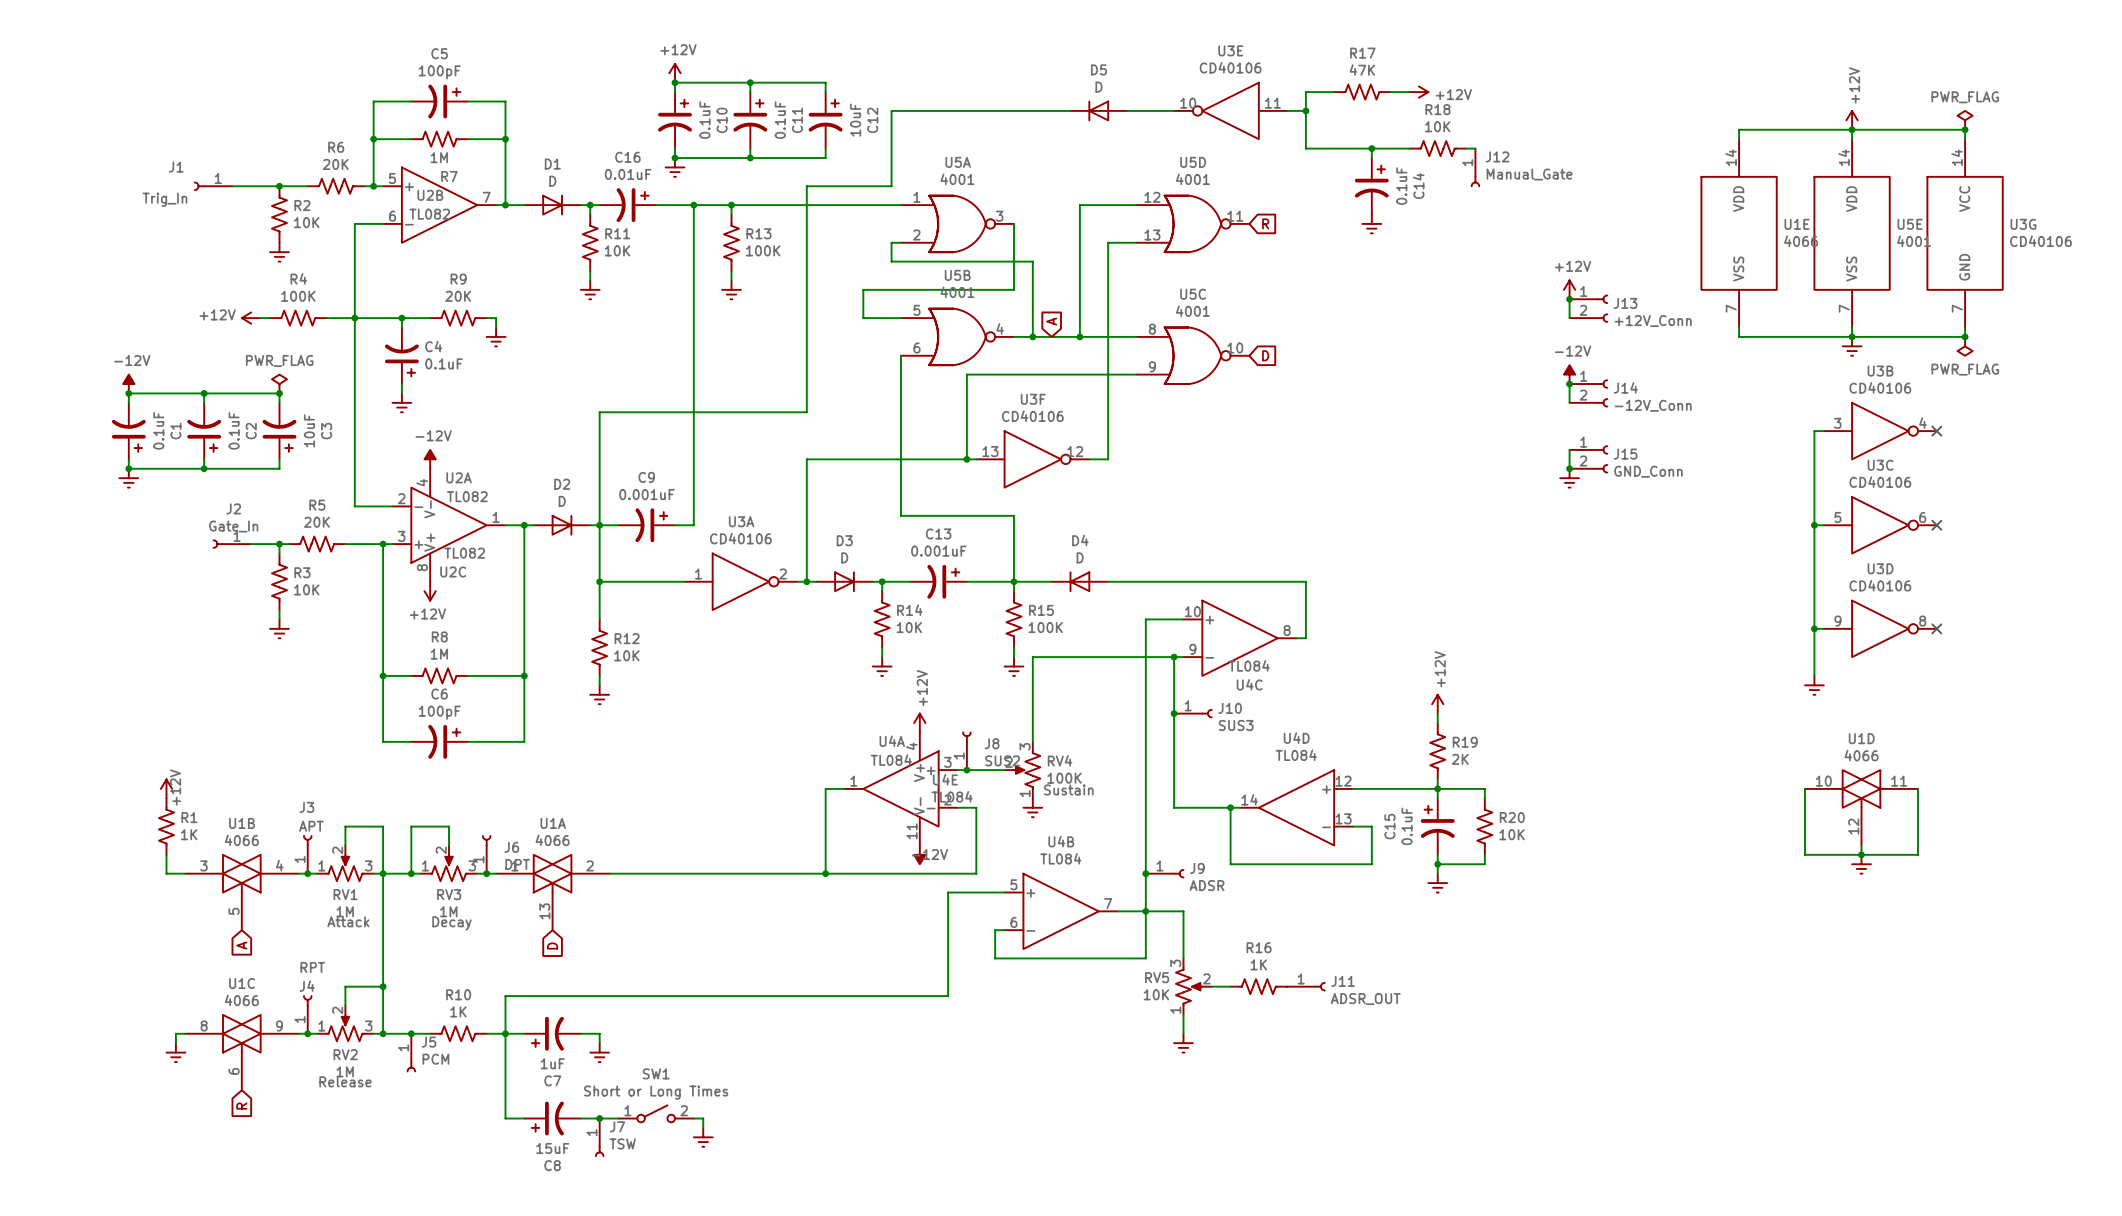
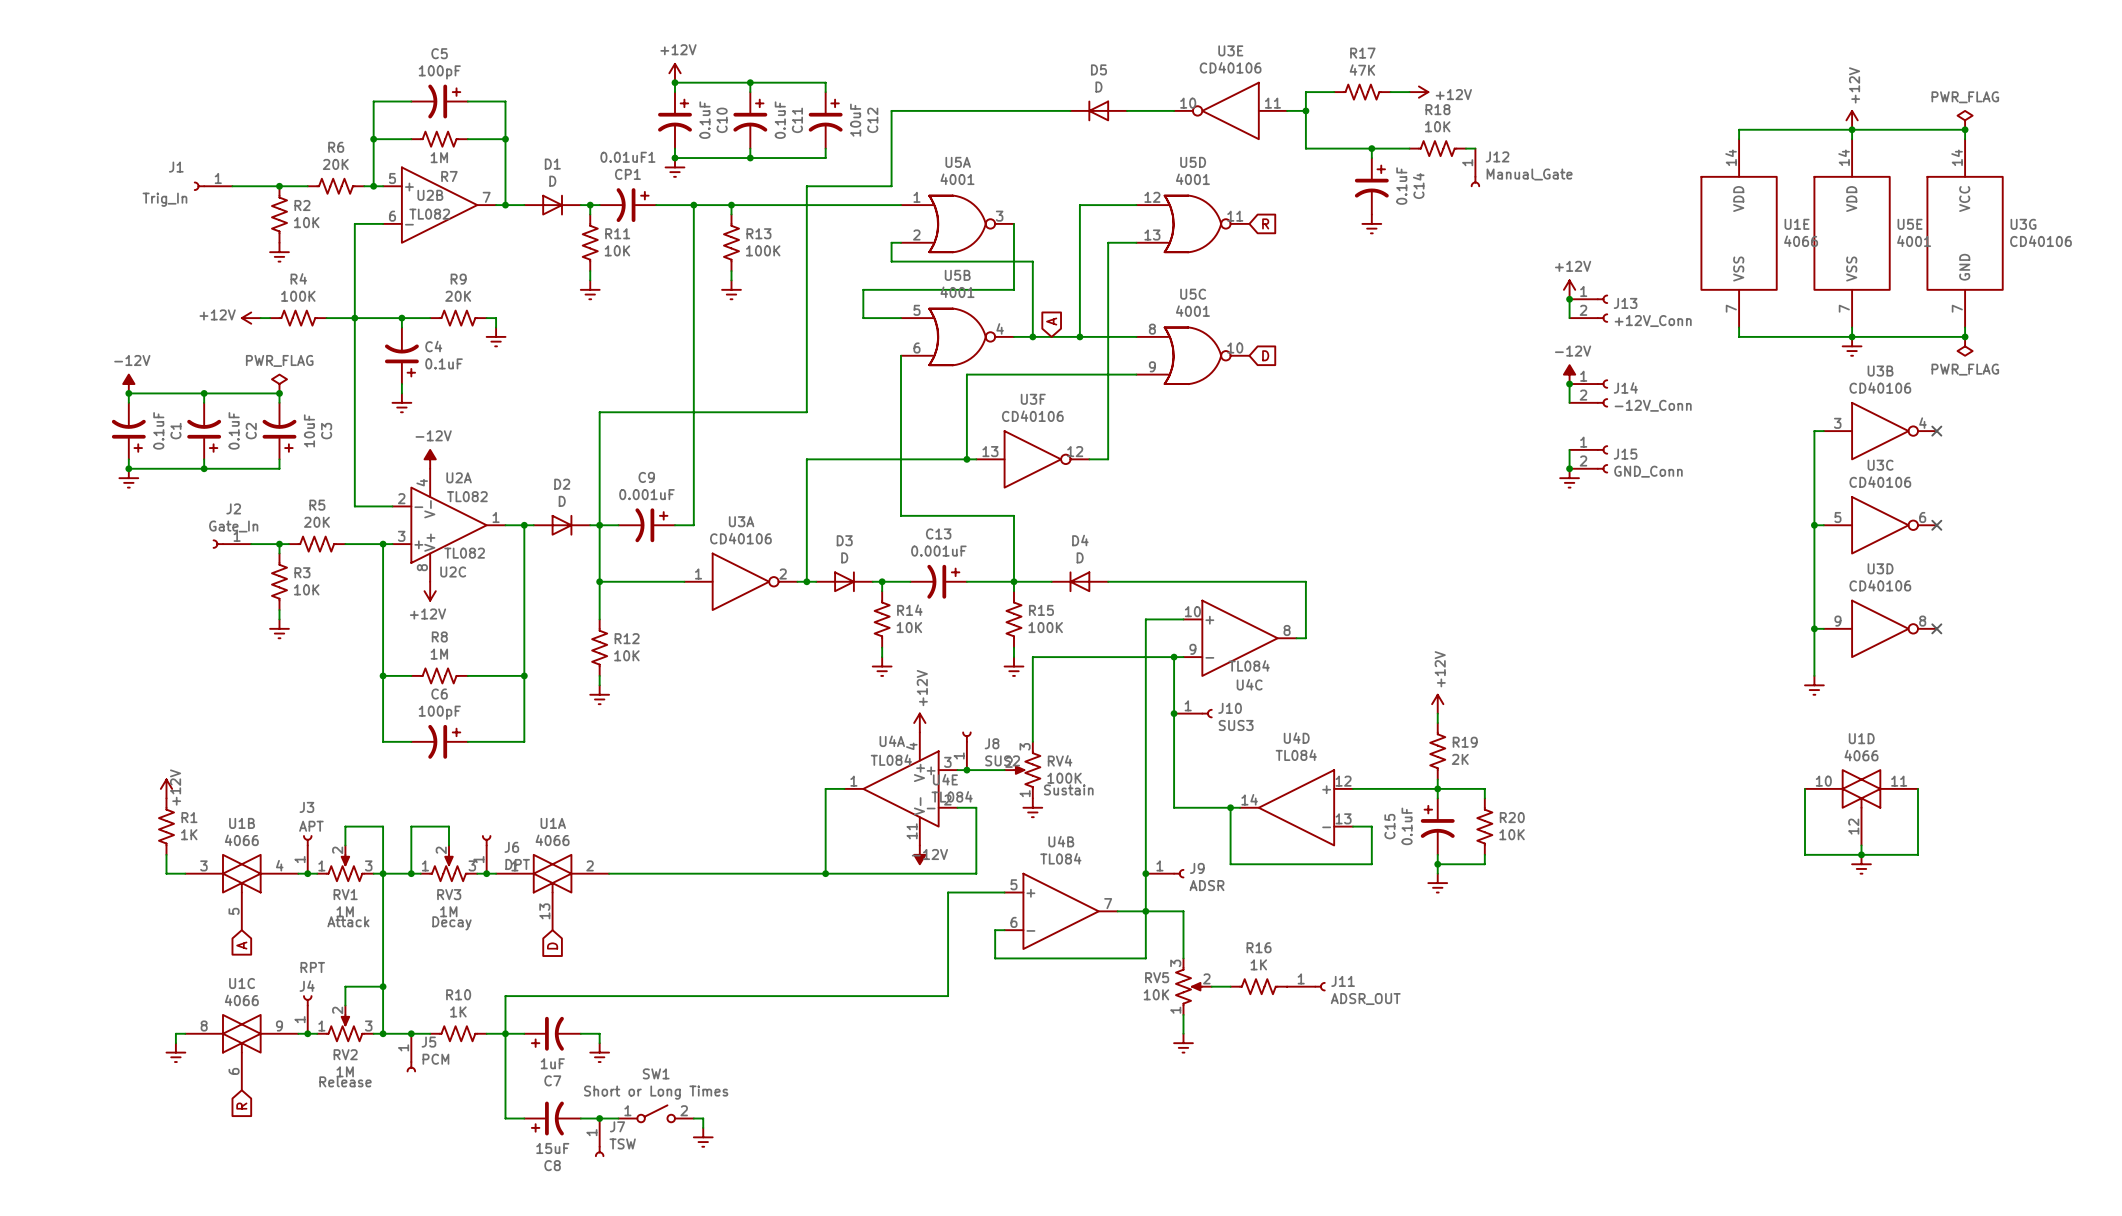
C16 name: C16 (627, 157) -> 0.01uF1 (627, 157)
C16 value: 0.01uF (628, 174) -> CP1 (627, 174)

